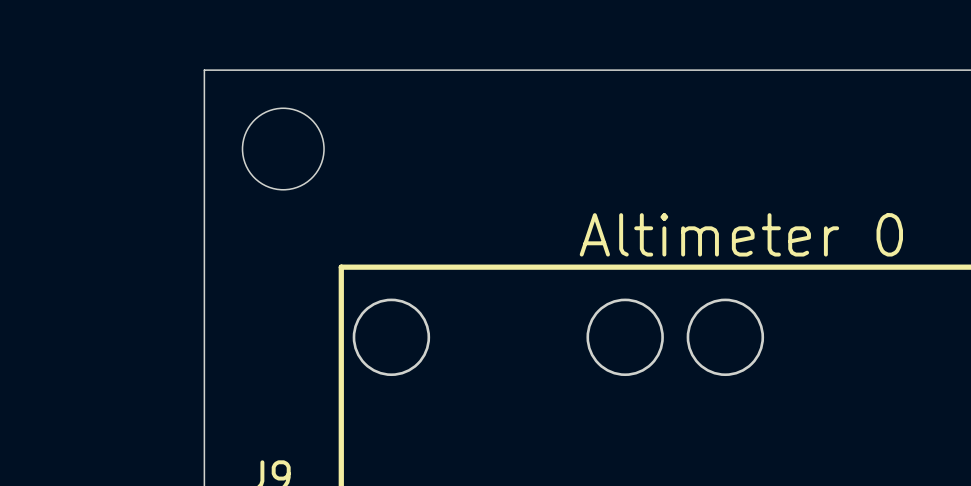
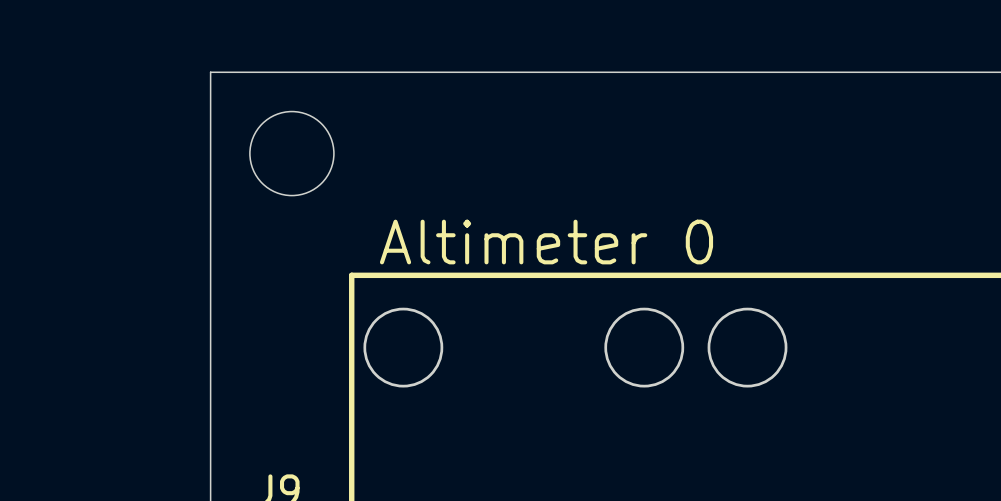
text position: Altimeter 0 (741, 234) -> Altimeter 0 (546, 242)

